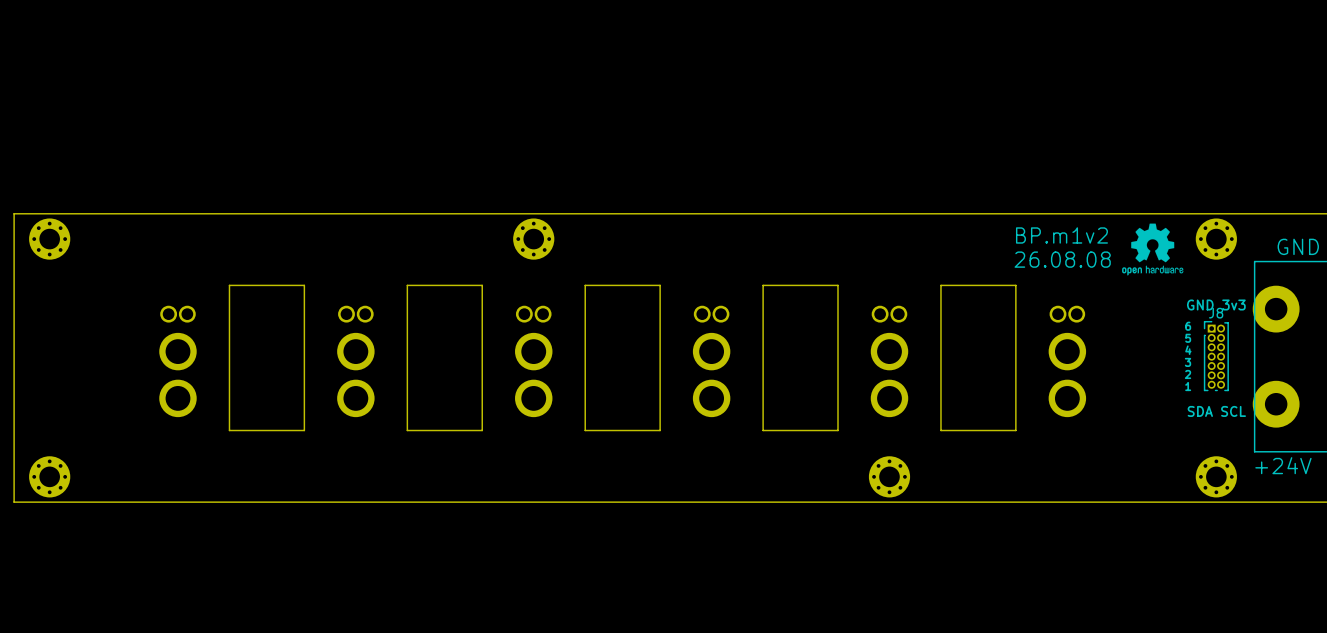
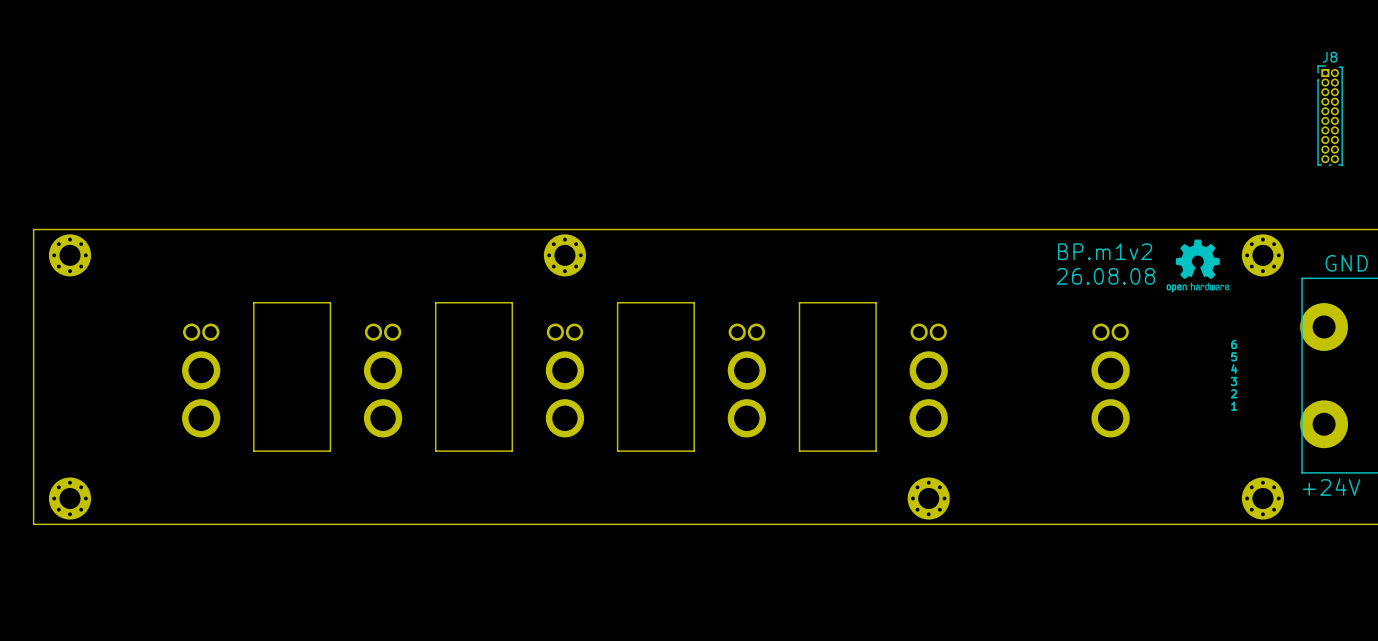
board edge: (1015, 285) (940, 285) (940, 430) (1015, 430) (1015, 285) -> none
text: GND 3v3 (1216, 304) -> none
J8 footprint: [1204, 321, 1229, 392] -> [1317, 65, 1343, 166]
text: SDA SCL (1216, 411) -> none

